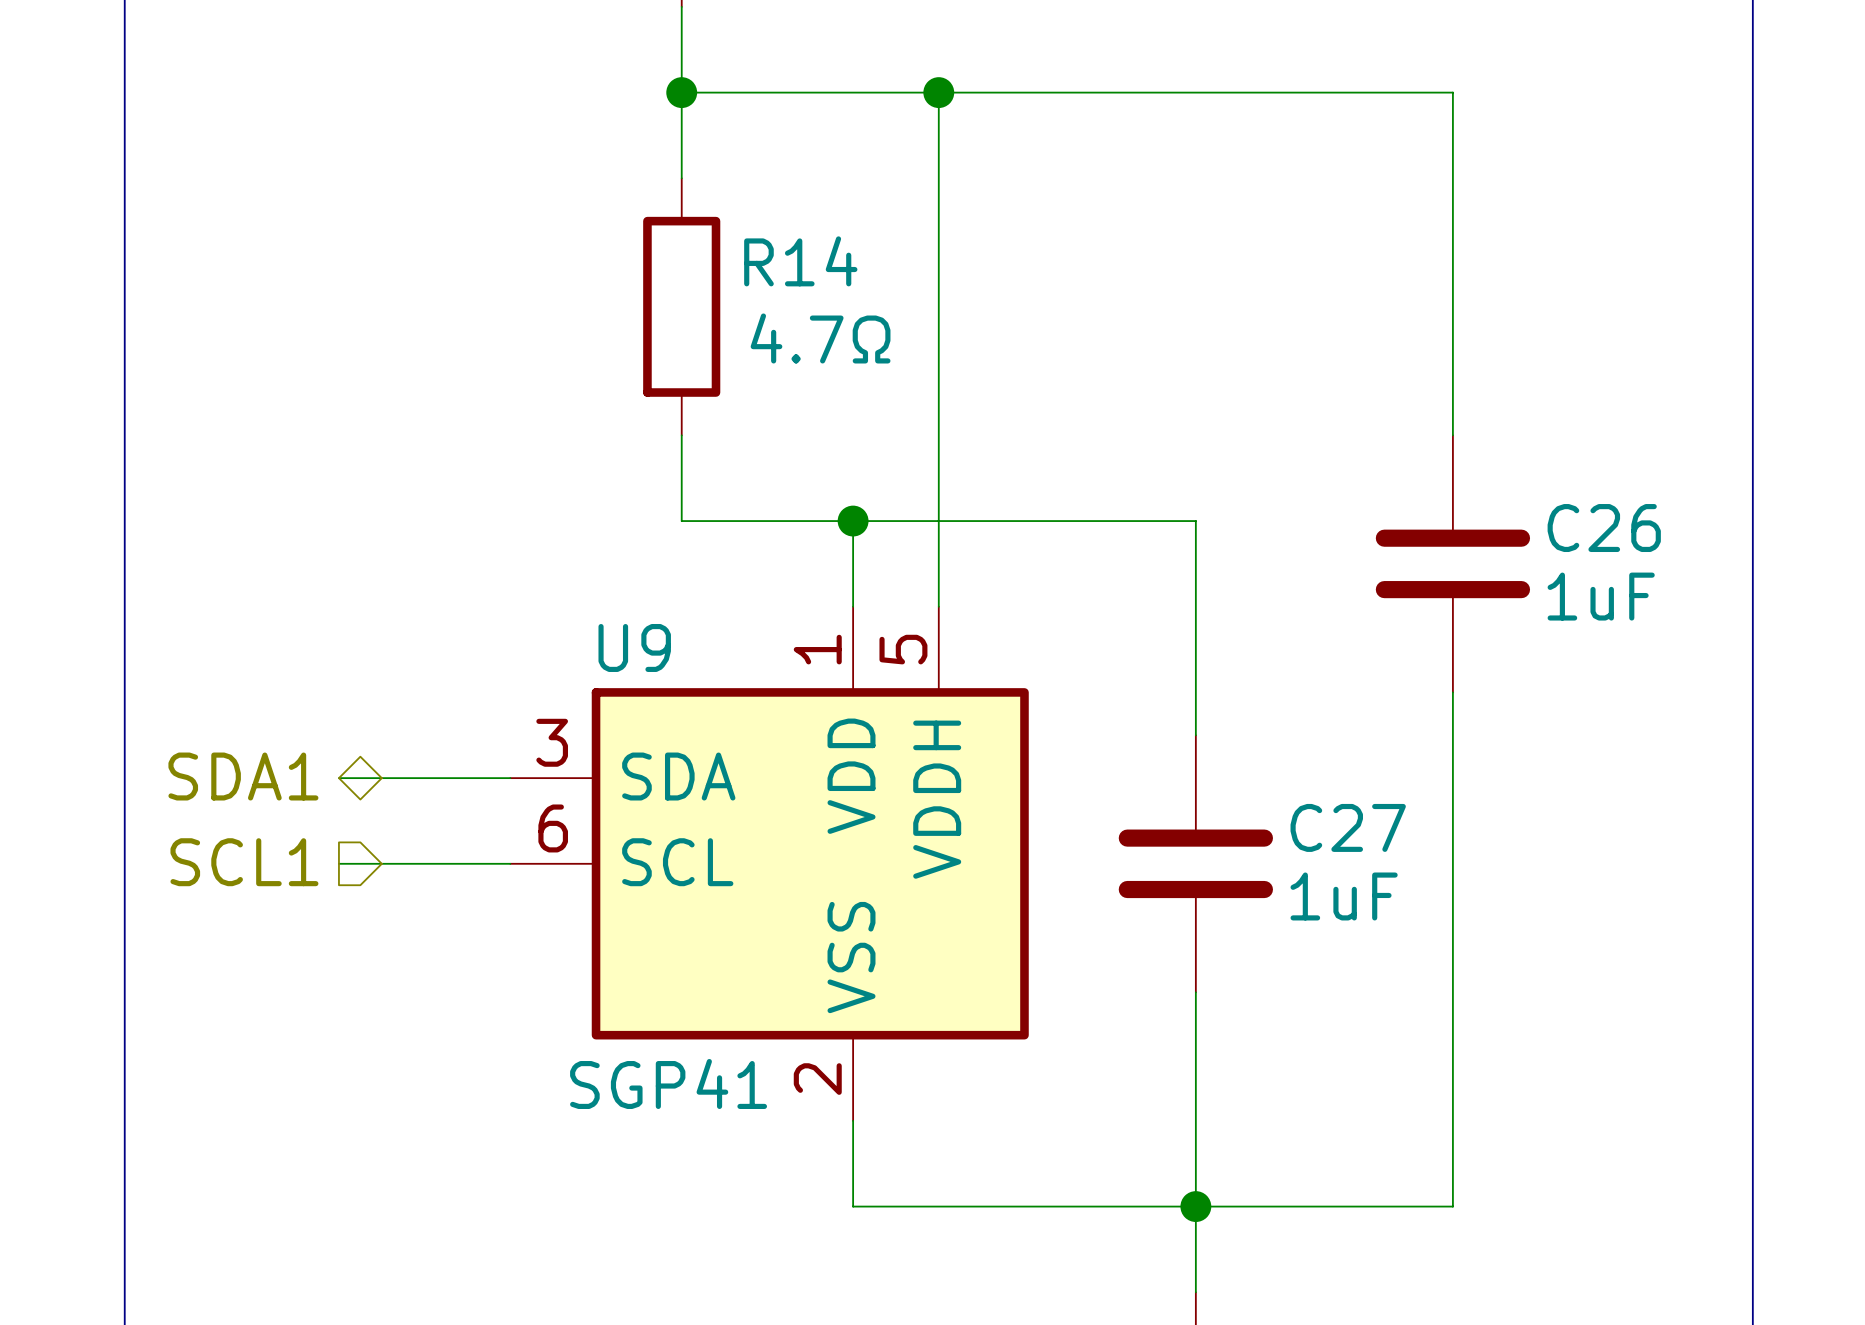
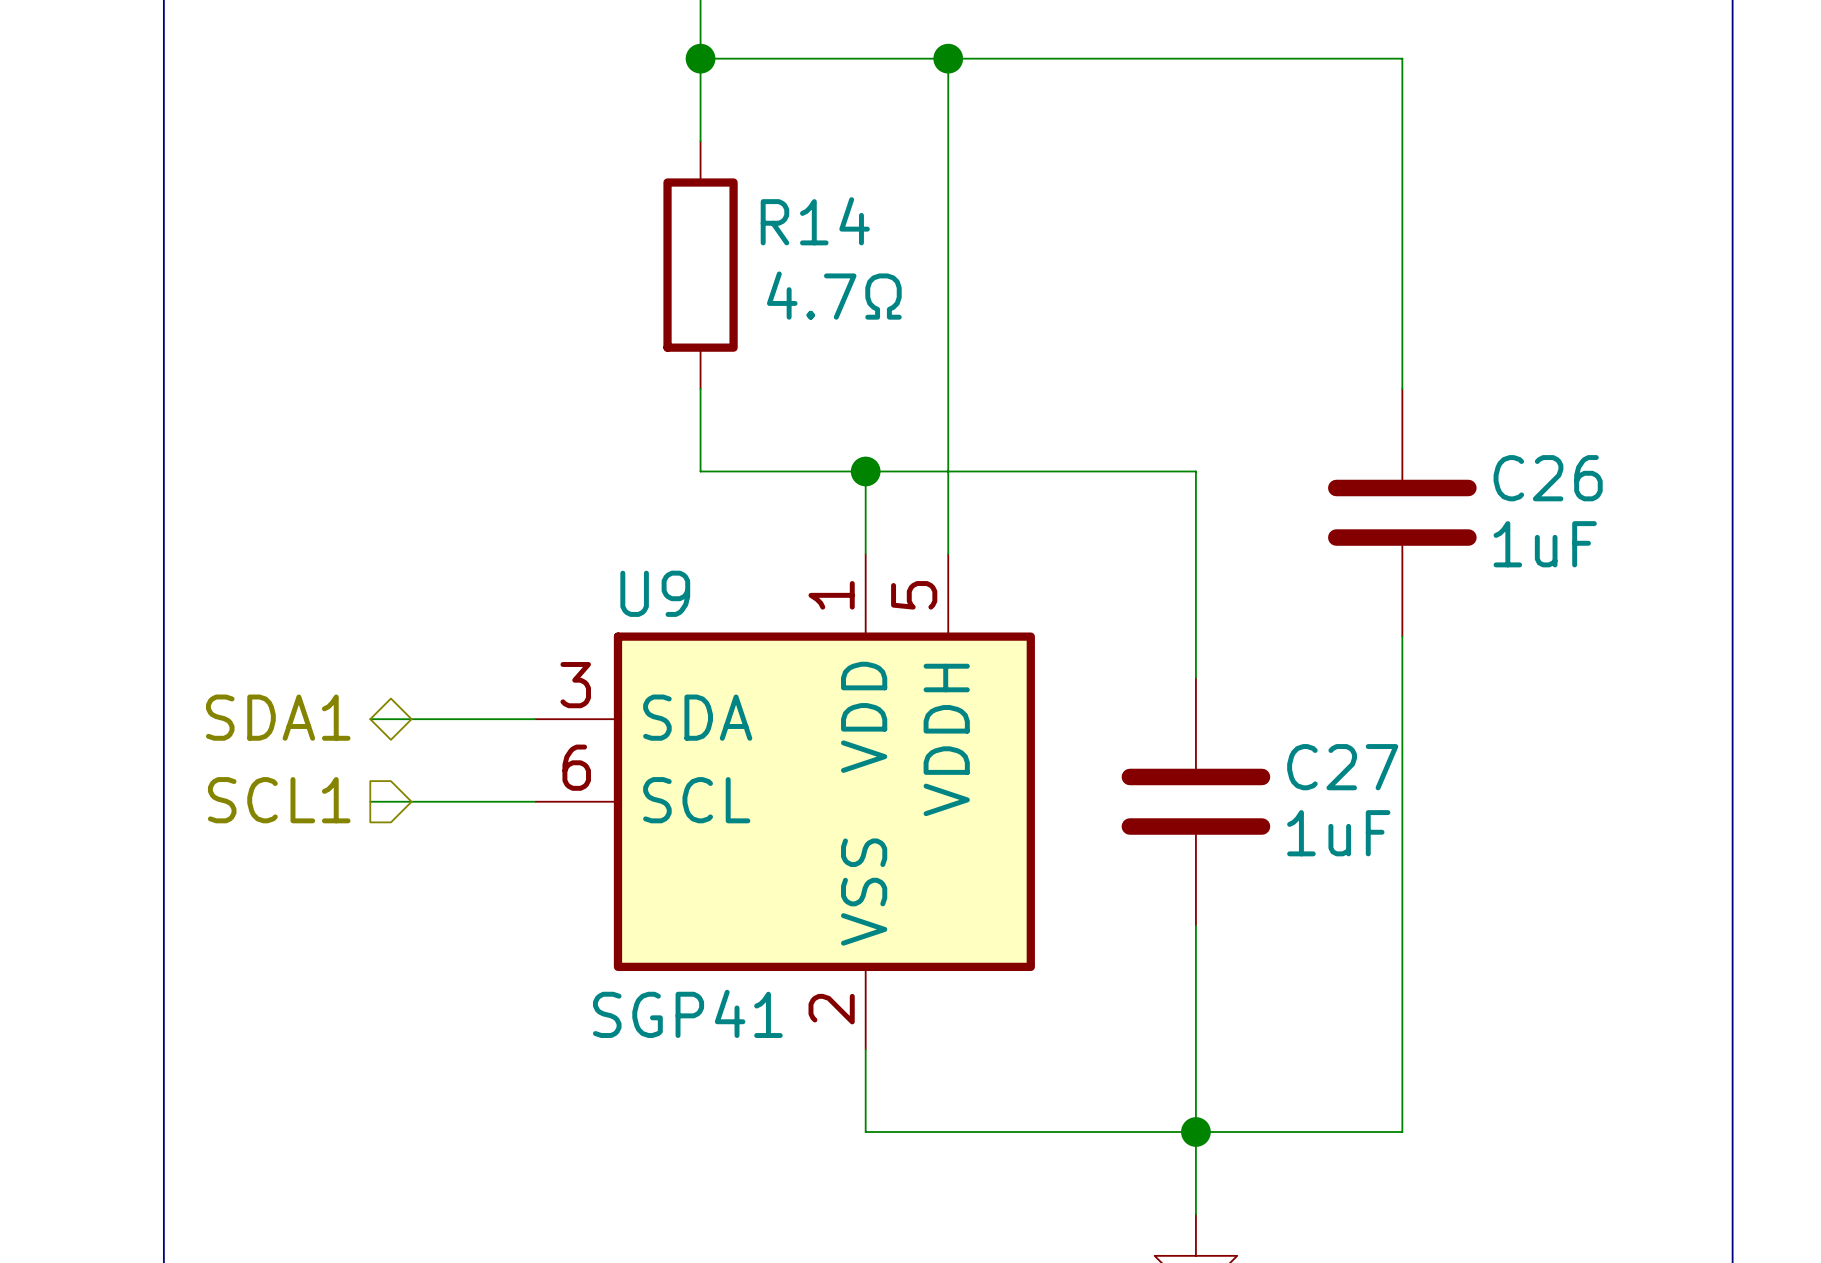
wire: (1410, 92) (1452, 92) (1452, 435) -> (1402, 58) (1402, 388)
C26 position: (1452, 563) -> (1402, 512)
wire: (1452, 692) (1452, 1206) (1410, 1206) -> (1402, 636) (1402, 1132)

